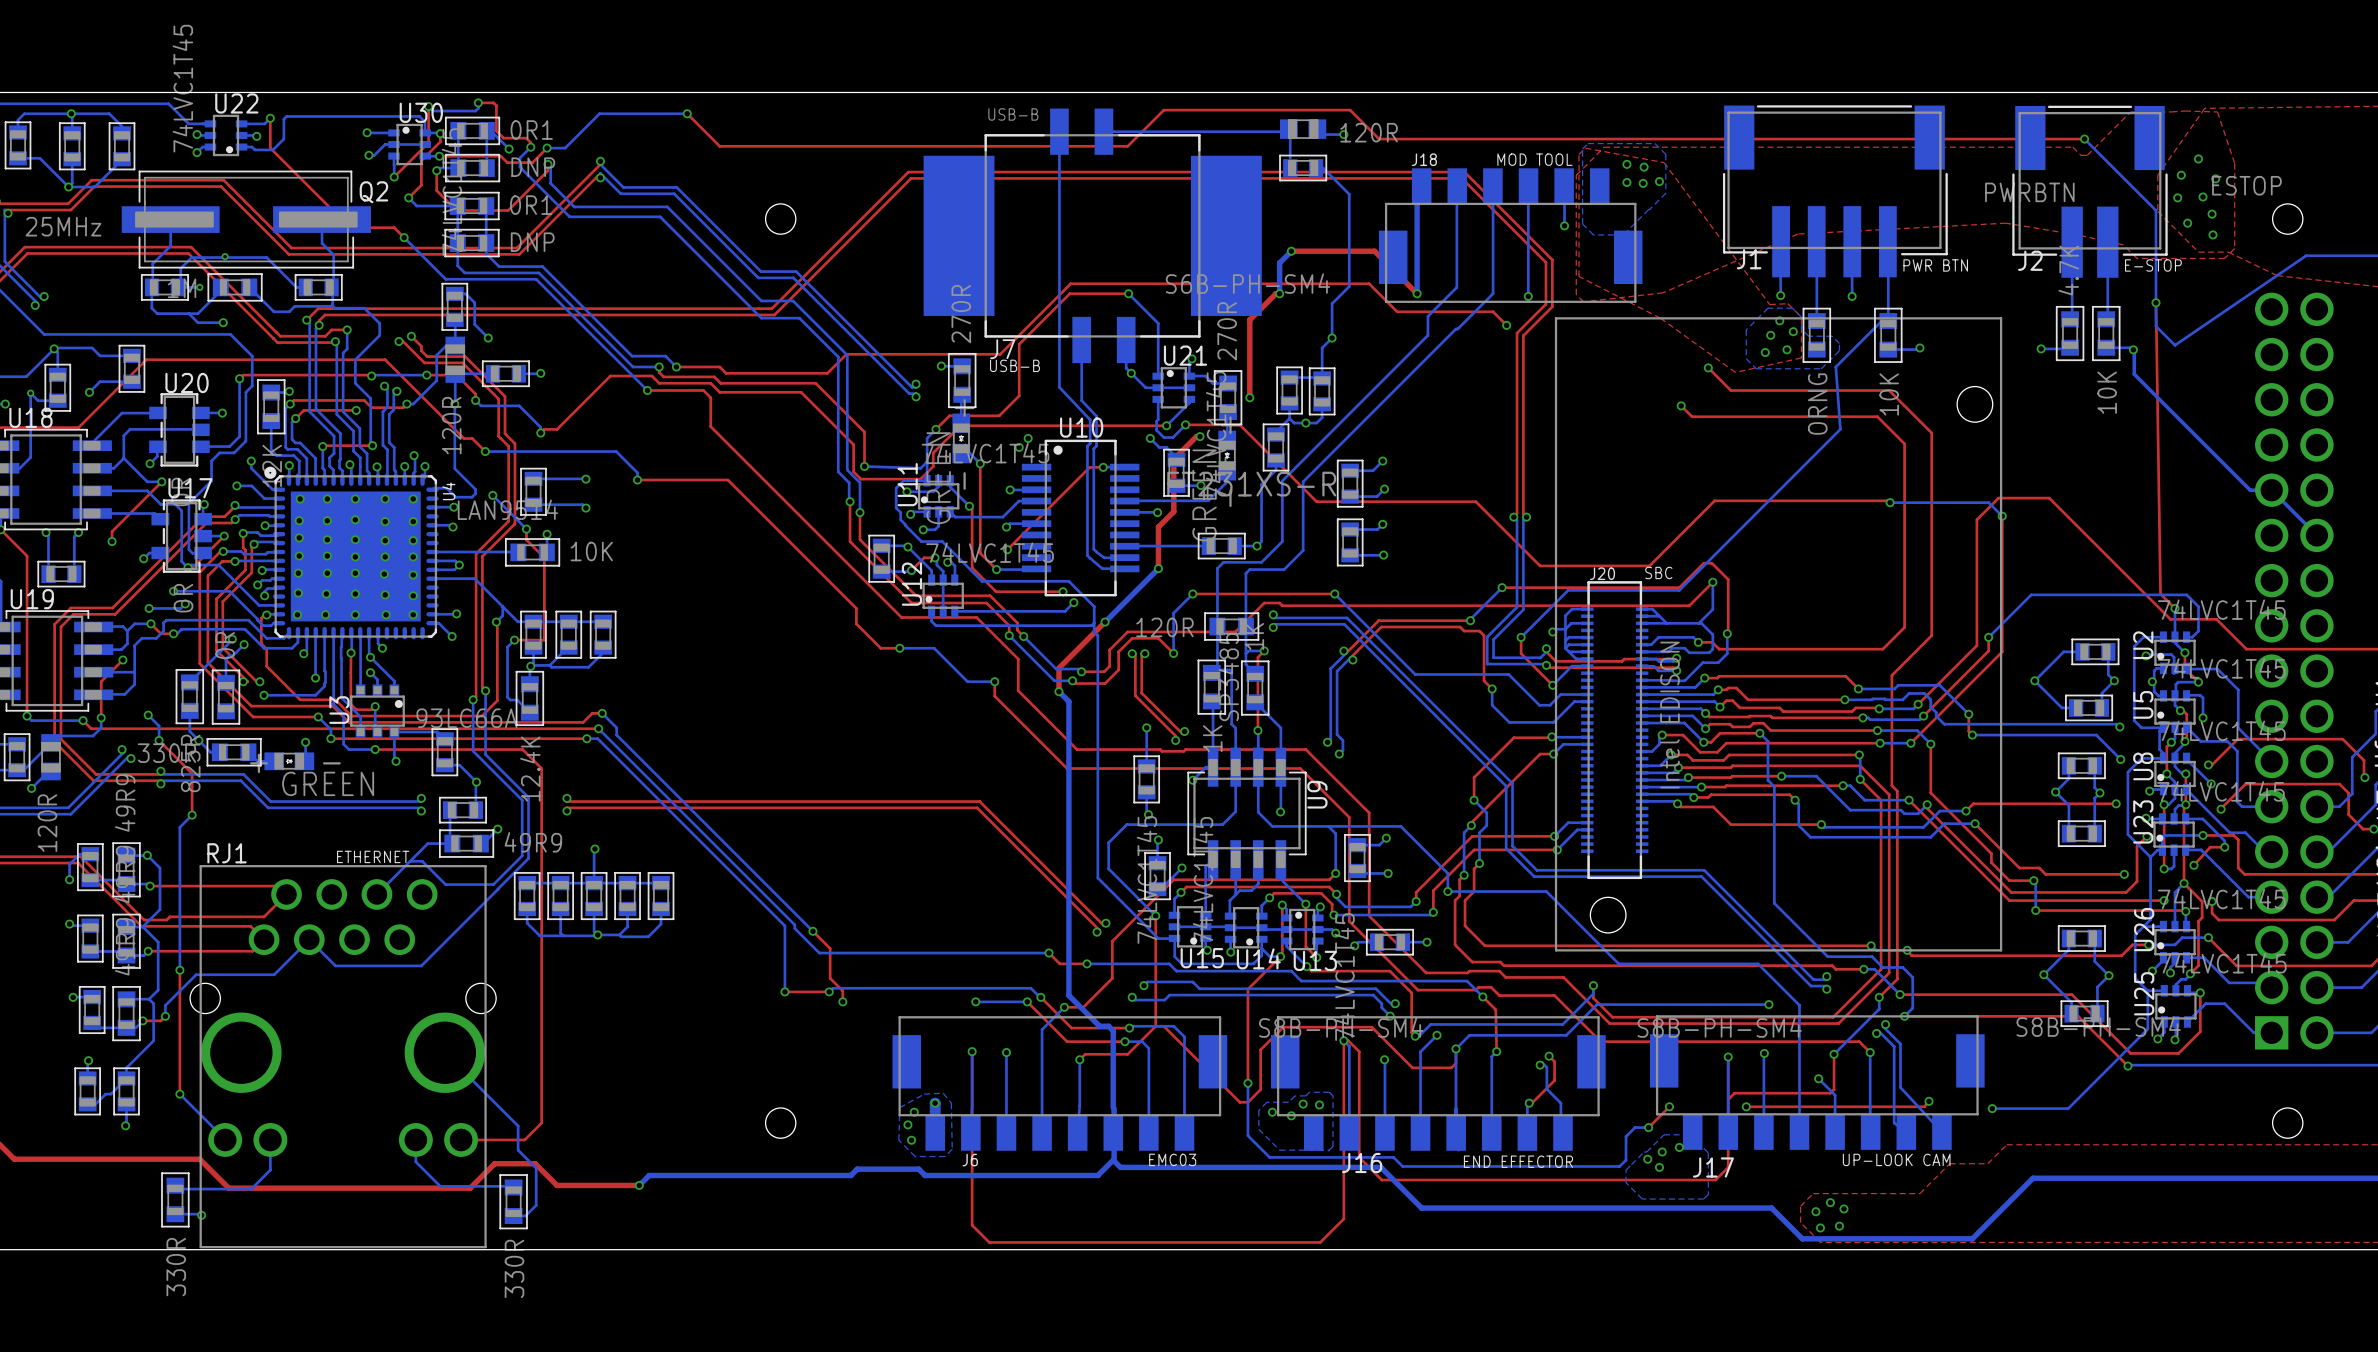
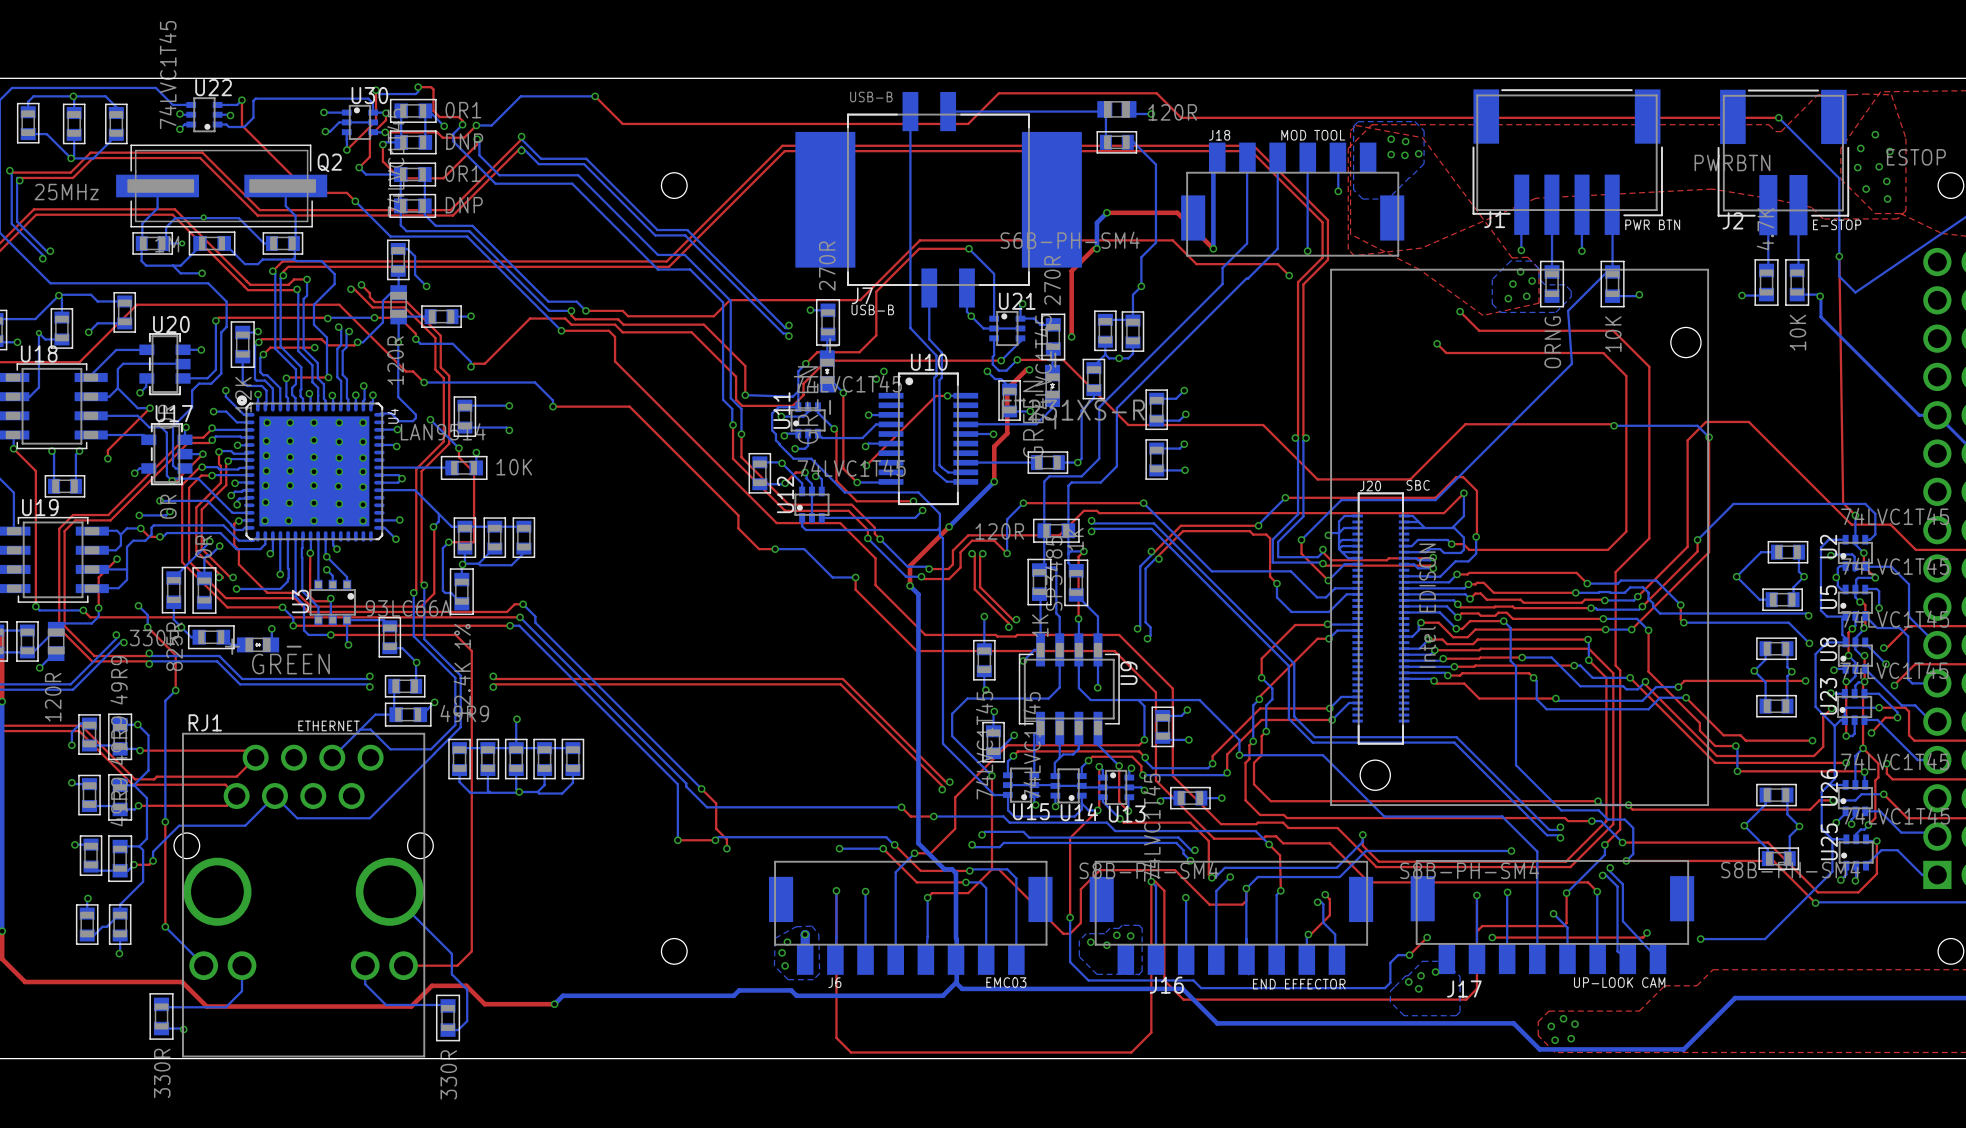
part value: 12.4K (530, 769) -> 12.4K 1% (462, 670)

